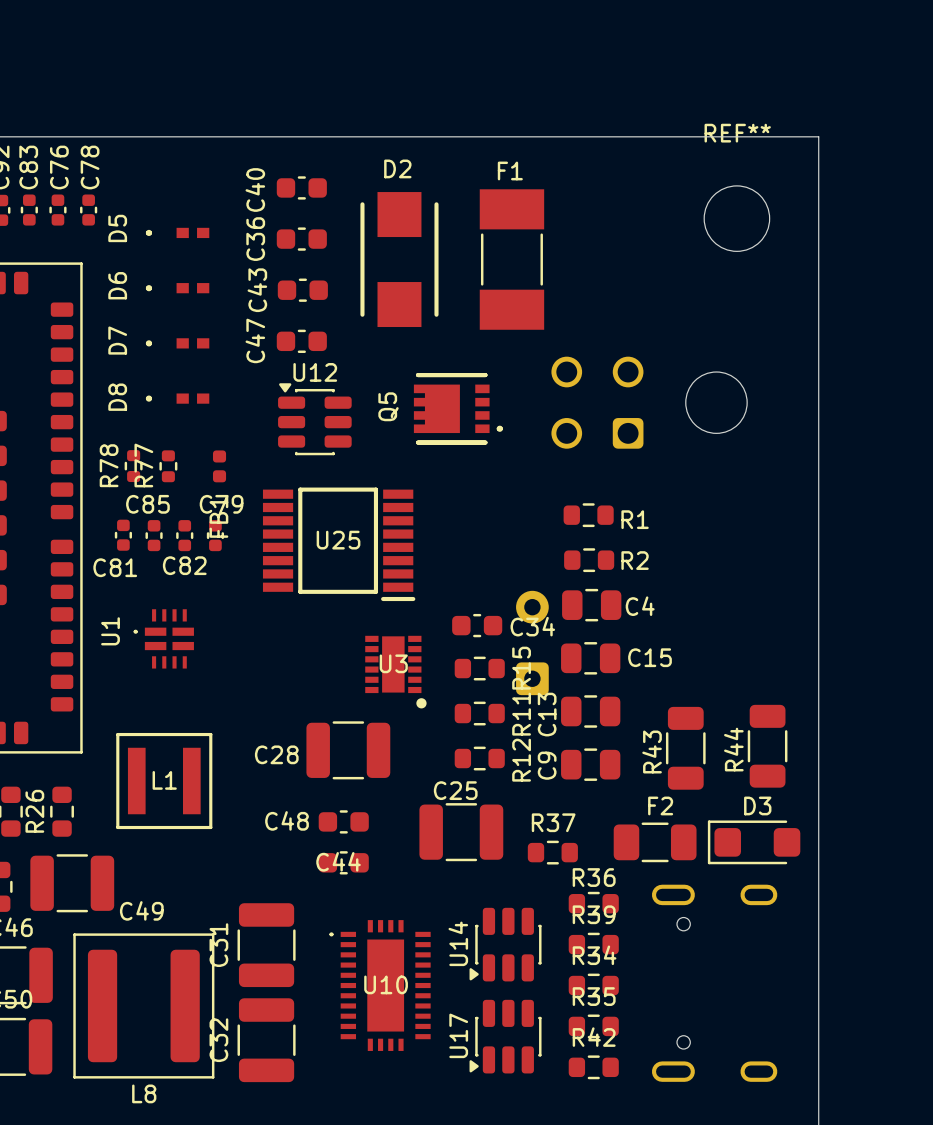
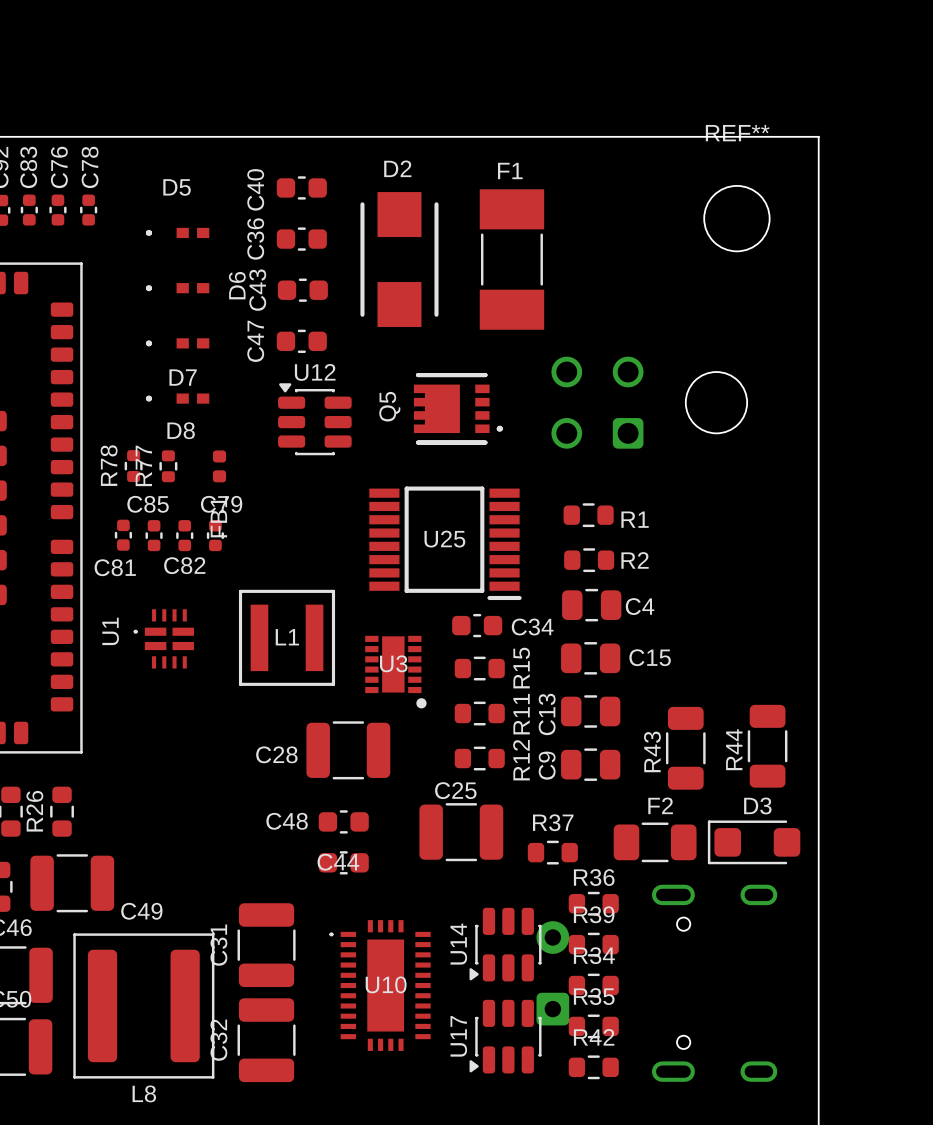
D5 name rotation: 0° (117, 228) -> 90° clockwise (177, 187)
D5 name position: D5 (117, 228) -> D5 (177, 187)
D6 name position: D6 (117, 285) -> D6 (237, 285)
D7 name rotation: 0° (117, 340) -> 90° clockwise (183, 377)
D7 name position: D7 (117, 340) -> D7 (183, 377)
D8 name rotation: 0° (117, 397) -> 90° clockwise (181, 430)
D8 name position: D8 (117, 397) -> D8 (181, 430)
U25 position: (339, 544) -> (445, 543)
part position: (532, 642) -> (552, 973)
L1 position: (164, 781) -> (287, 637)

